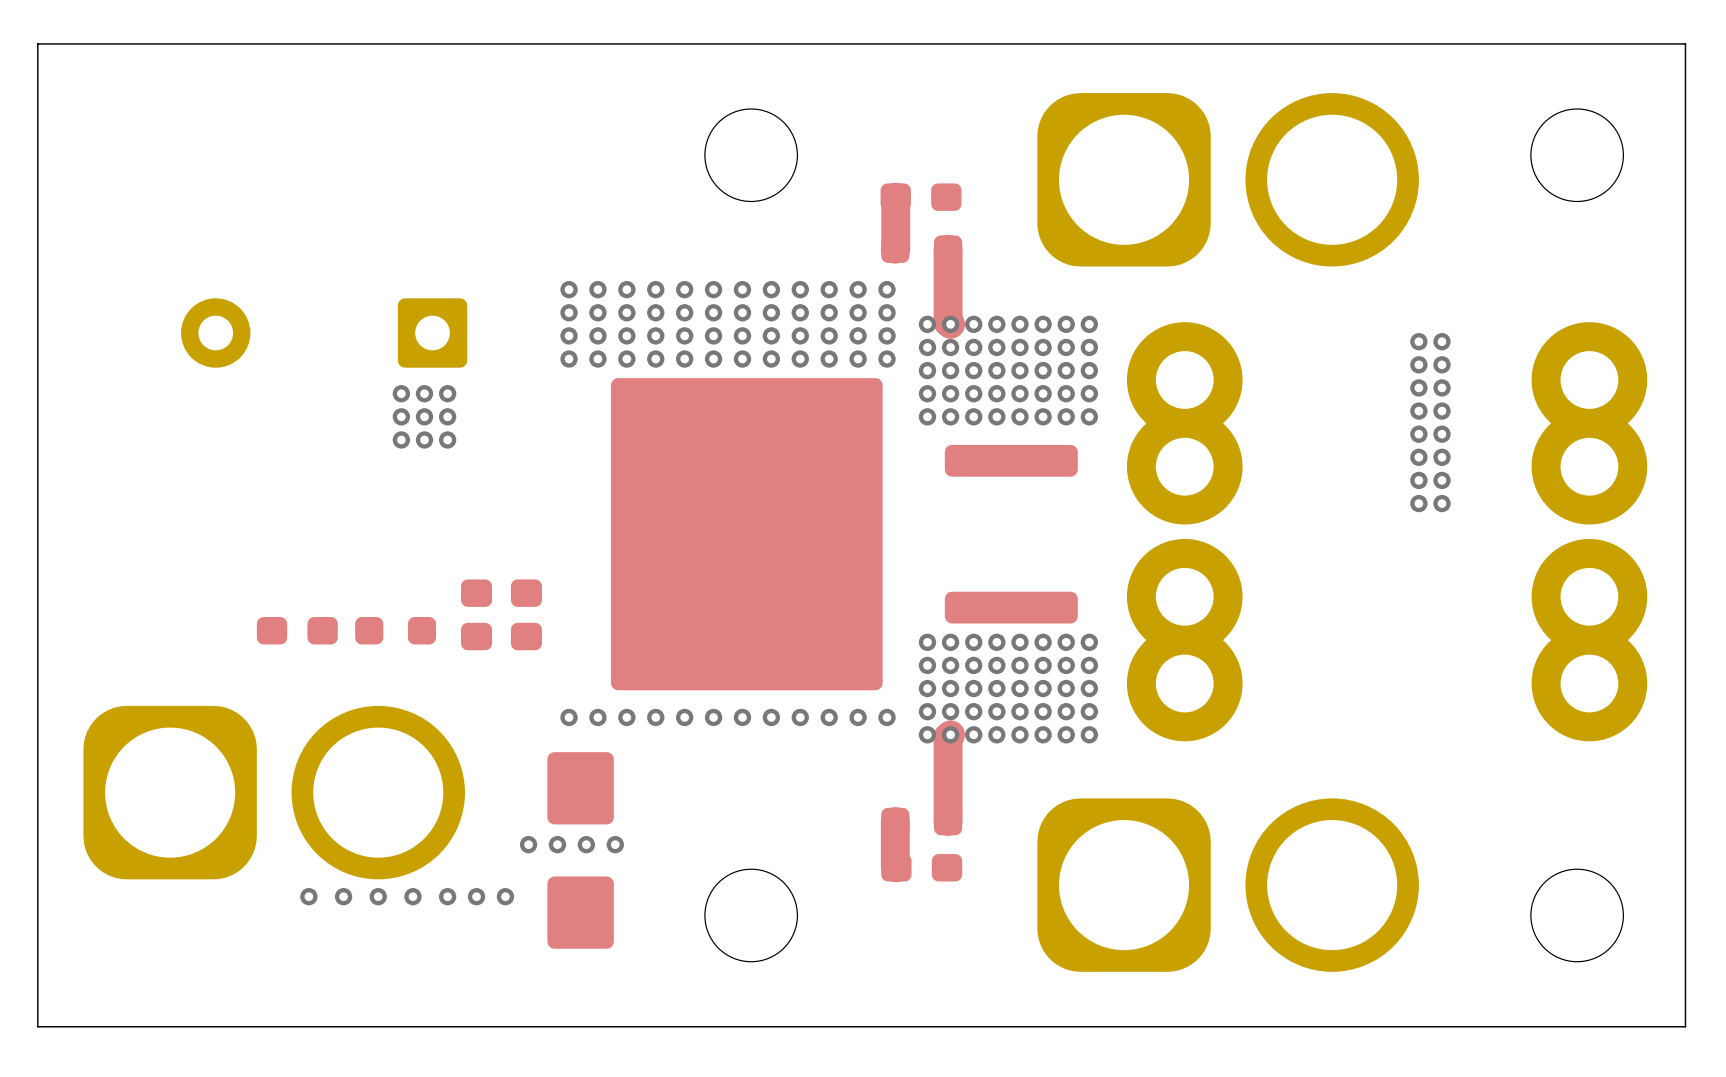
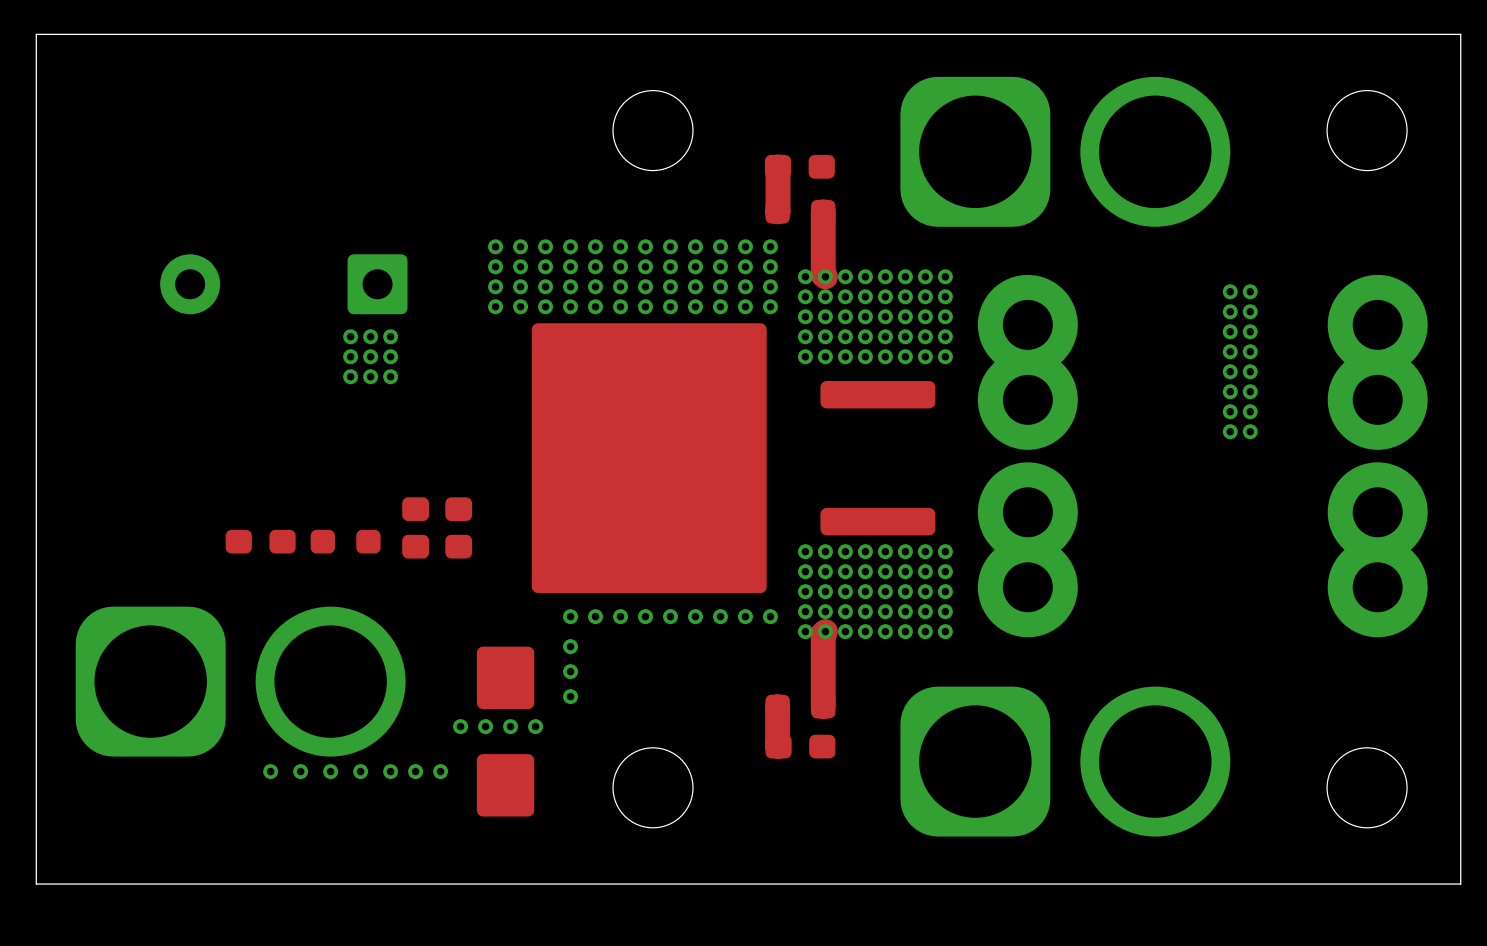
via: (569, 717) -> none
via: (597, 717) -> none
via: (626, 717) -> none
via: none -> (570, 646)
via: none -> (570, 671)
via: none -> (570, 696)

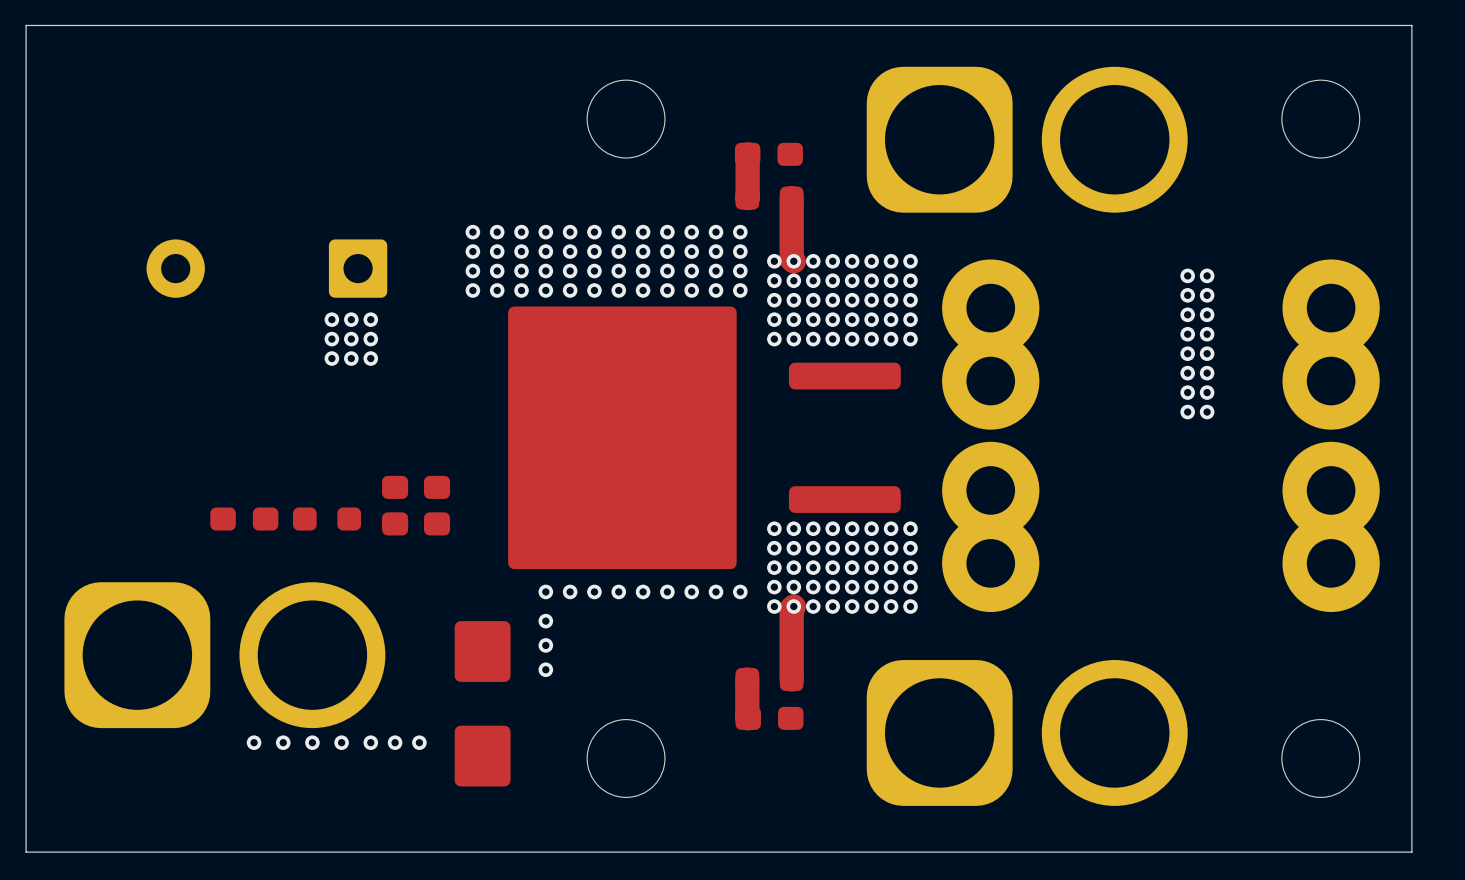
via: (460, 726) -> none
via: (485, 726) -> none
via: (510, 726) -> none
via: (535, 726) -> none

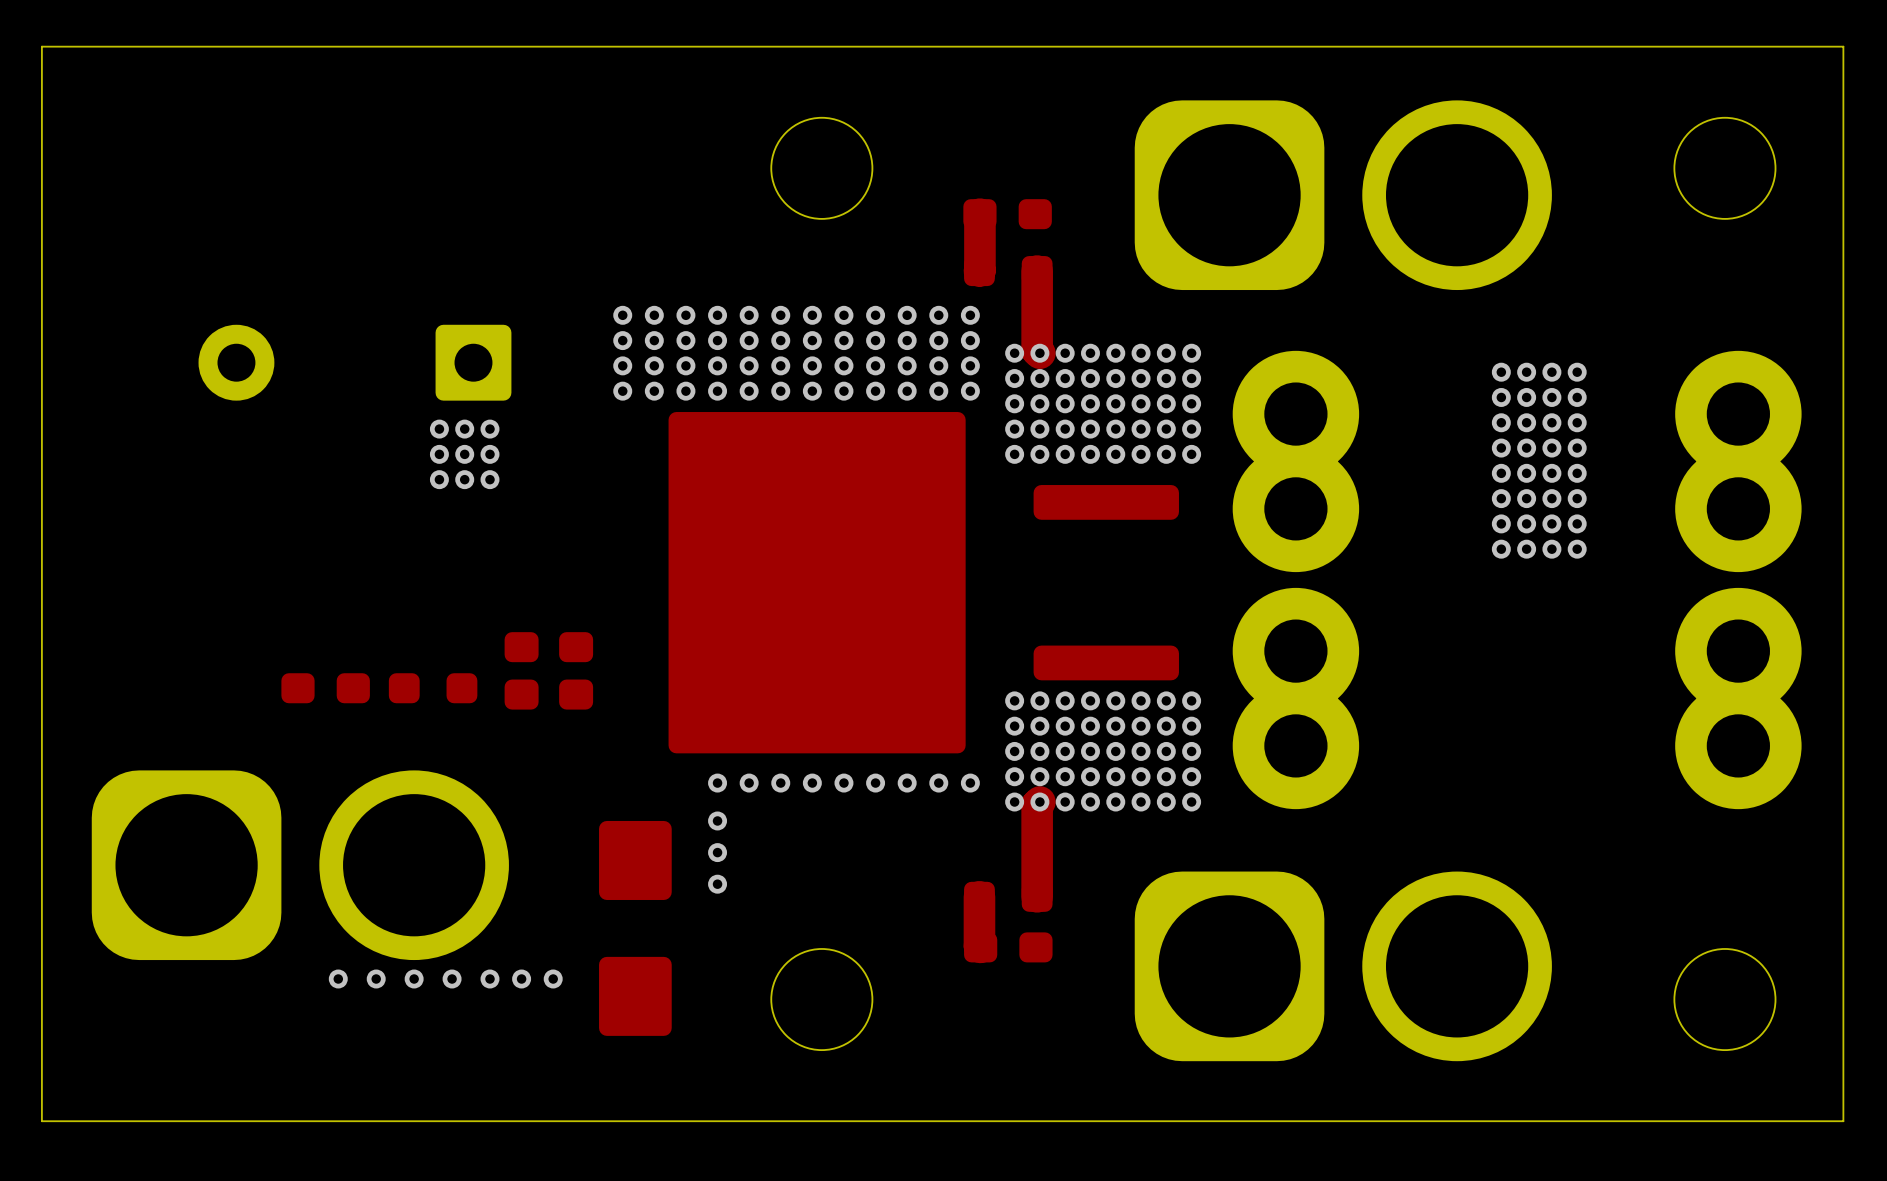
via: none -> (1501, 372)
via: none -> (1526, 372)
via: none -> (1501, 397)
via: none -> (1526, 397)
via: none -> (1501, 422)
via: none -> (1526, 422)
via: none -> (1501, 448)
via: none -> (1526, 448)
via: none -> (1501, 473)
via: none -> (1526, 473)
via: none -> (1501, 498)
via: none -> (1526, 498)
via: none -> (1501, 523)
via: none -> (1526, 523)
via: none -> (1501, 549)
via: none -> (1526, 549)

